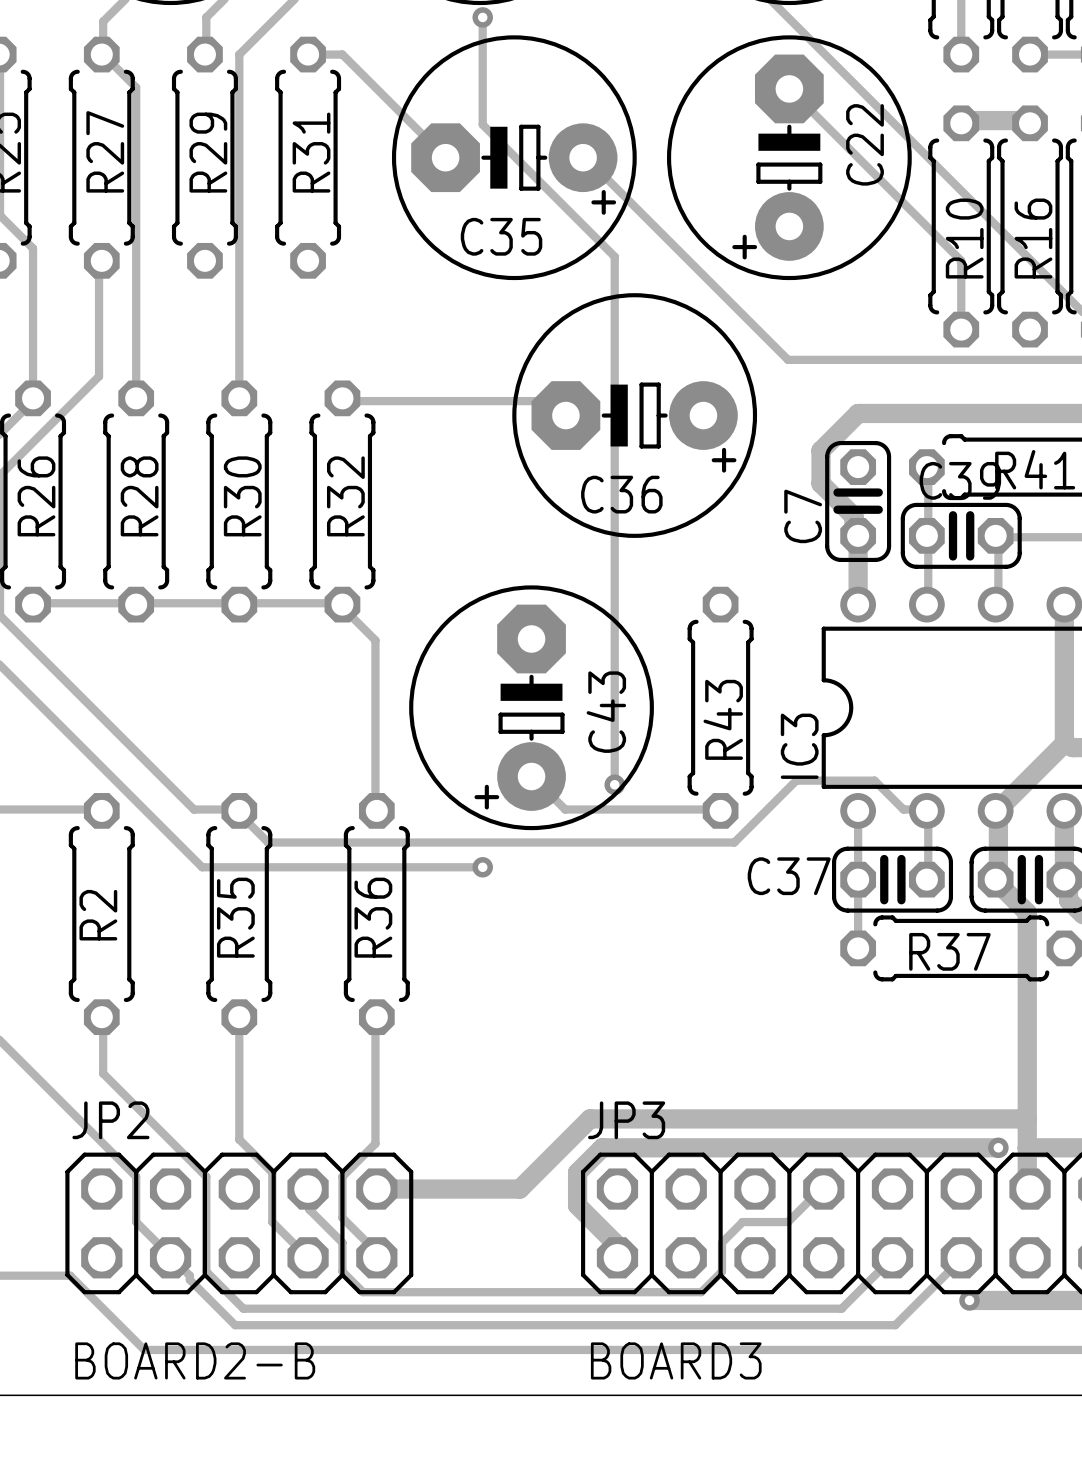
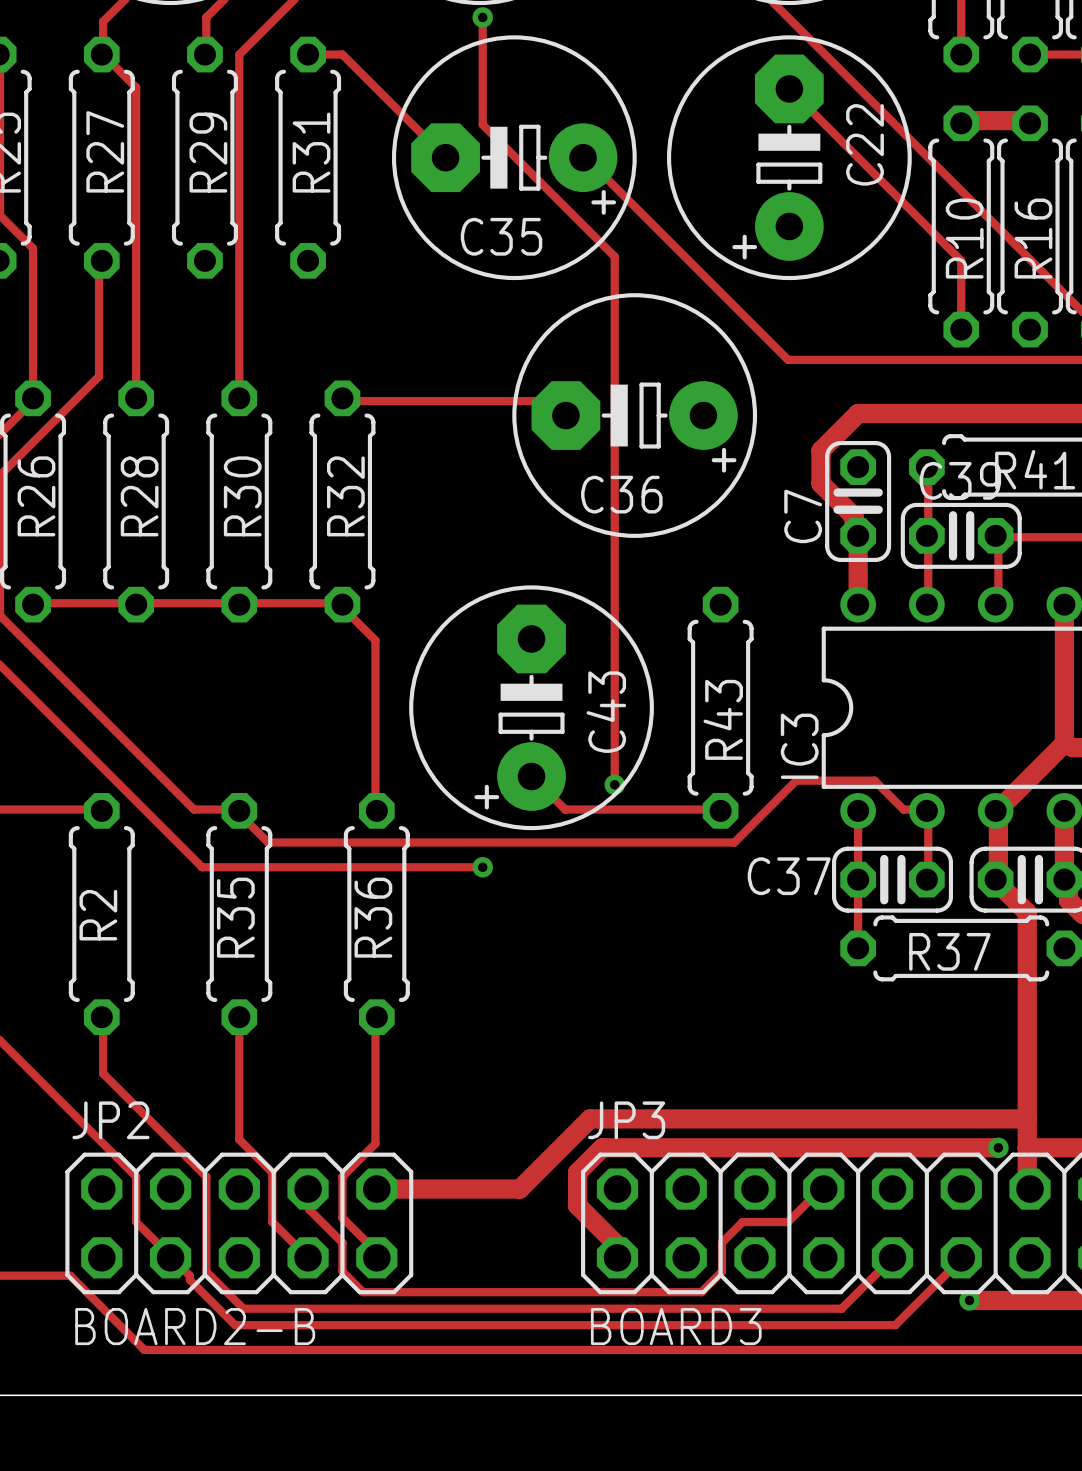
text position: BOARD2-B (195, 1360) -> BOARD2-B (195, 1326)
text position: BOARD3 (676, 1360) -> BOARD3 (676, 1326)

